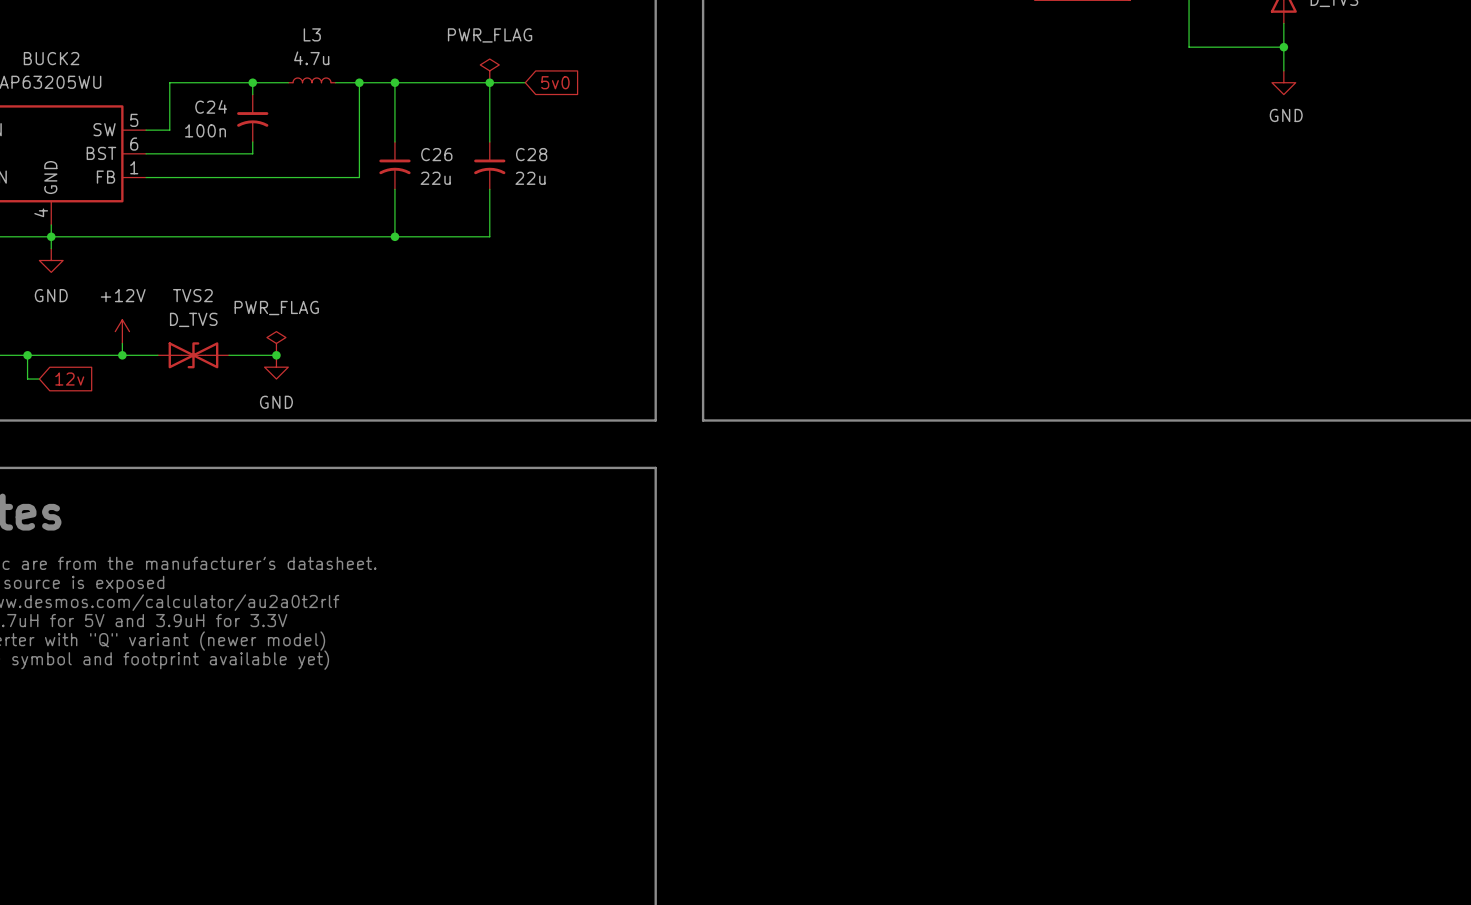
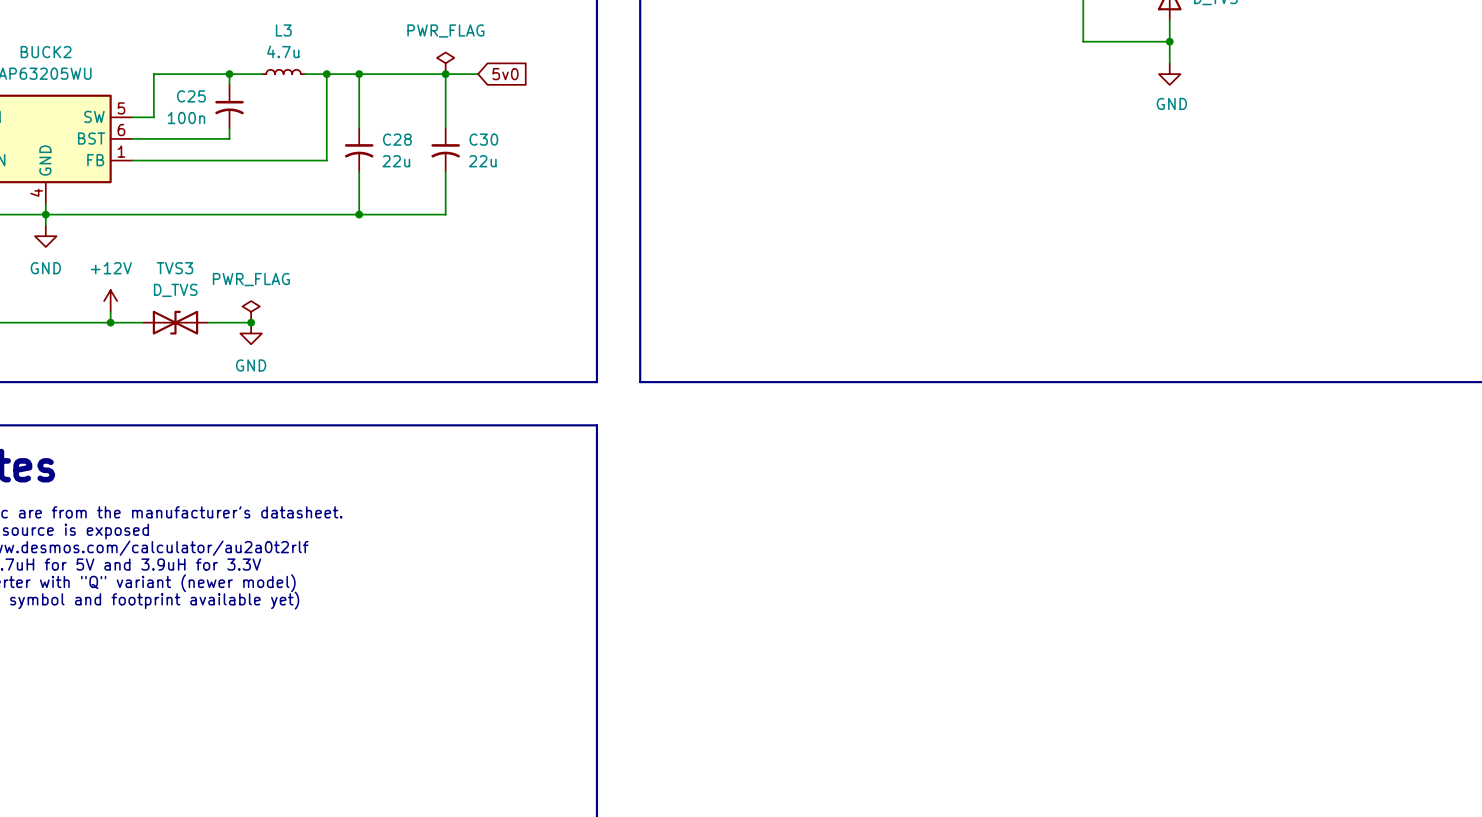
C24 name: C24 (211, 106) -> C25 (191, 96)
C26 name: C26 (436, 154) -> C28 (397, 139)
C28 name: C28 (531, 154) -> C30 (483, 139)
TVS2 name: TVS2 (192, 295) -> TVS3 (174, 268)
wire: (27, 355) (27, 379) (39, 379) -> none
junction: (27, 355) -> none
global label: 12v (69, 379) -> none

